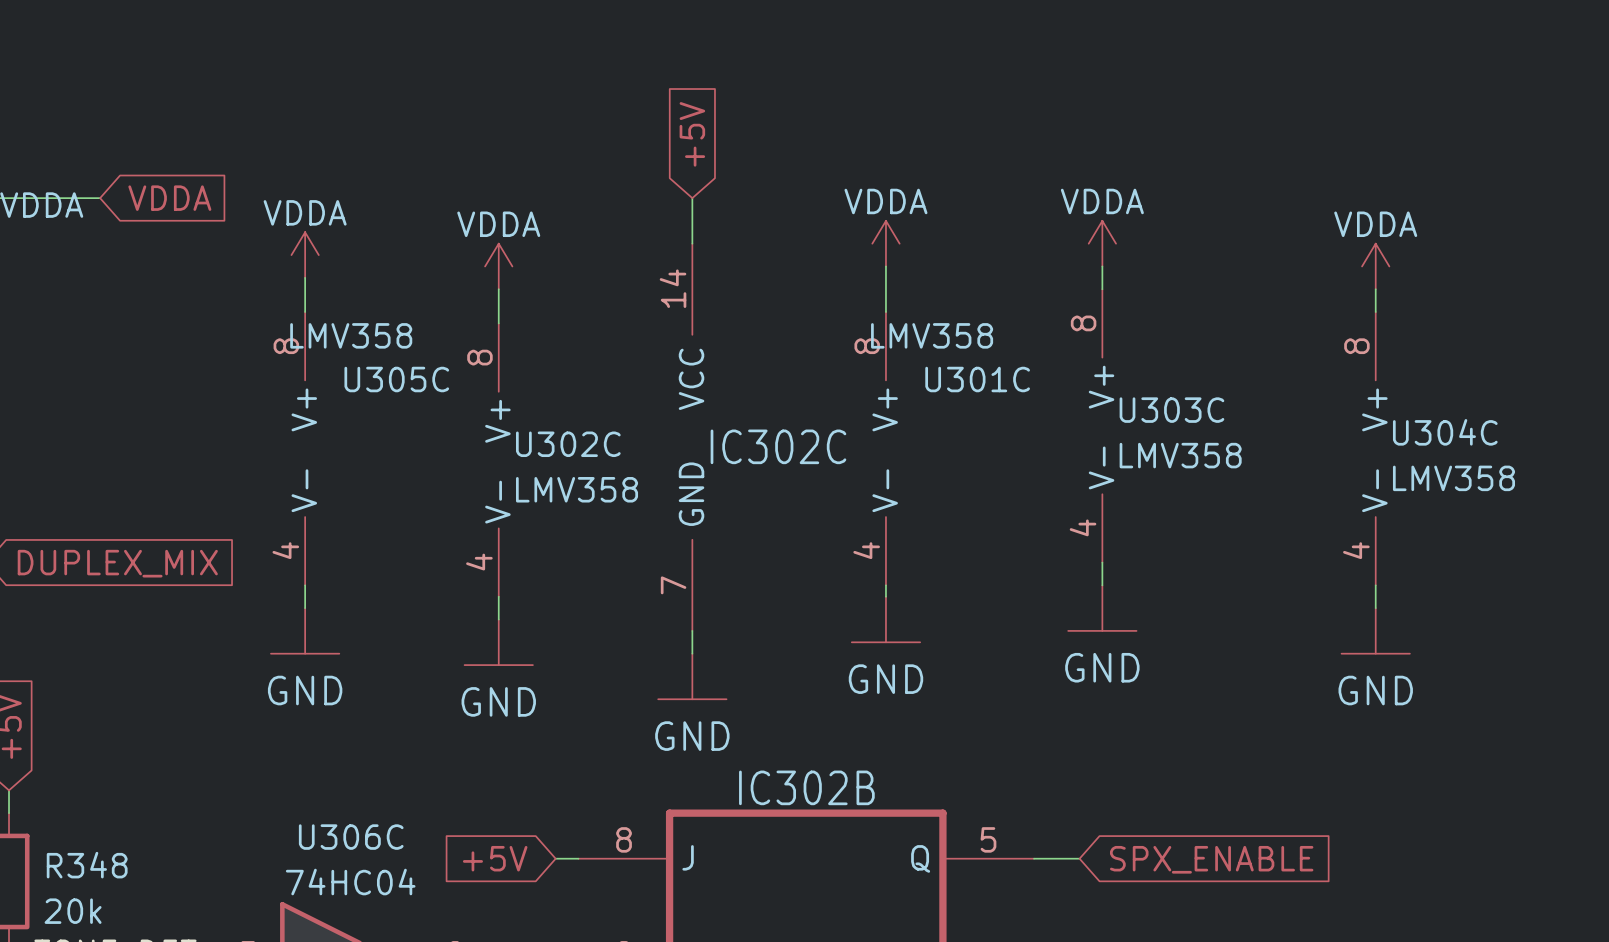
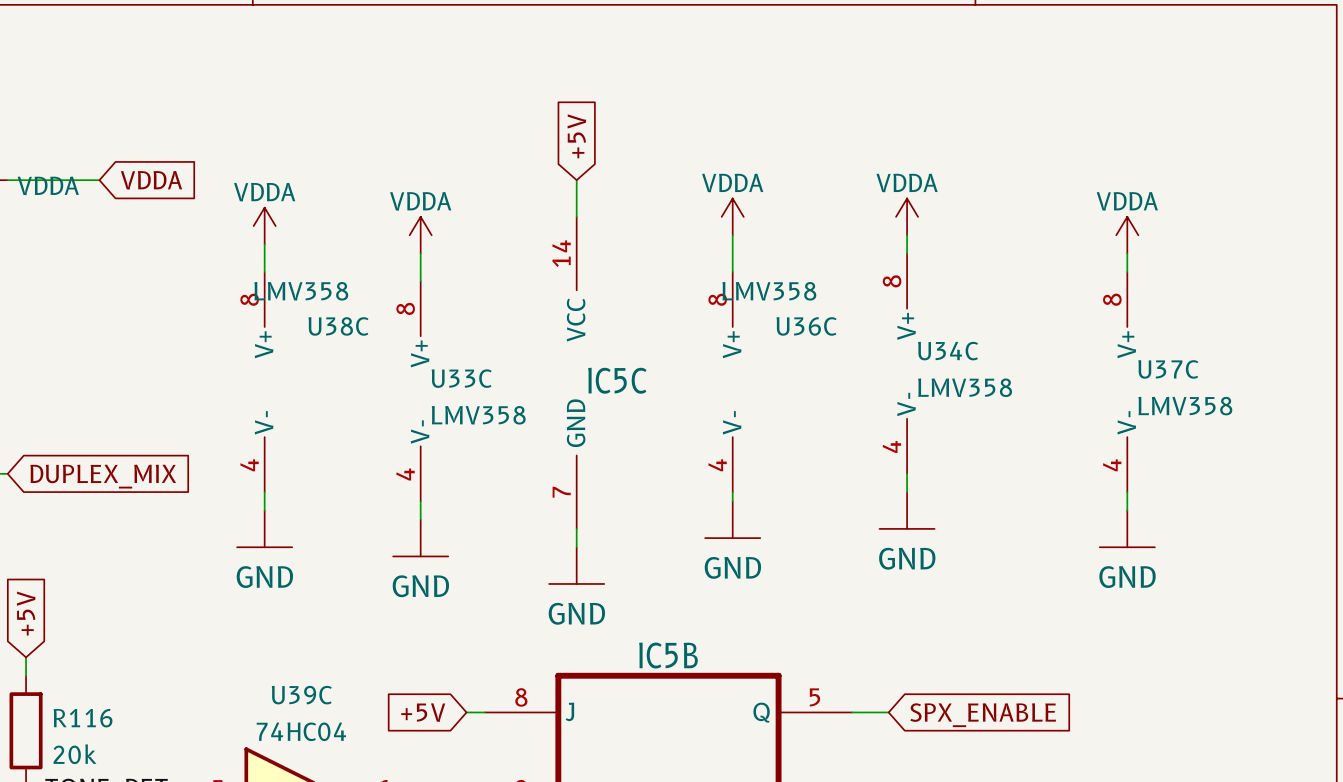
U305C name: U305C (396, 379) -> U38C (338, 326)
U301C name: U301C (977, 379) -> U36C (806, 326)
U303C name: U303C (1171, 410) -> U34C (948, 351)
U304C name: U304C (1445, 432) -> U37C (1168, 369)
U302C name: U302C (568, 444) -> U33C (461, 378)
IC302C name: IC302C (778, 446) -> IC5C (617, 380)
IC302B name: IC302B (806, 787) -> IC5B (668, 655)
U306C name: U306C (351, 837) -> U39C (301, 695)
R348 name: R348 (87, 865) -> R116 (83, 718)

